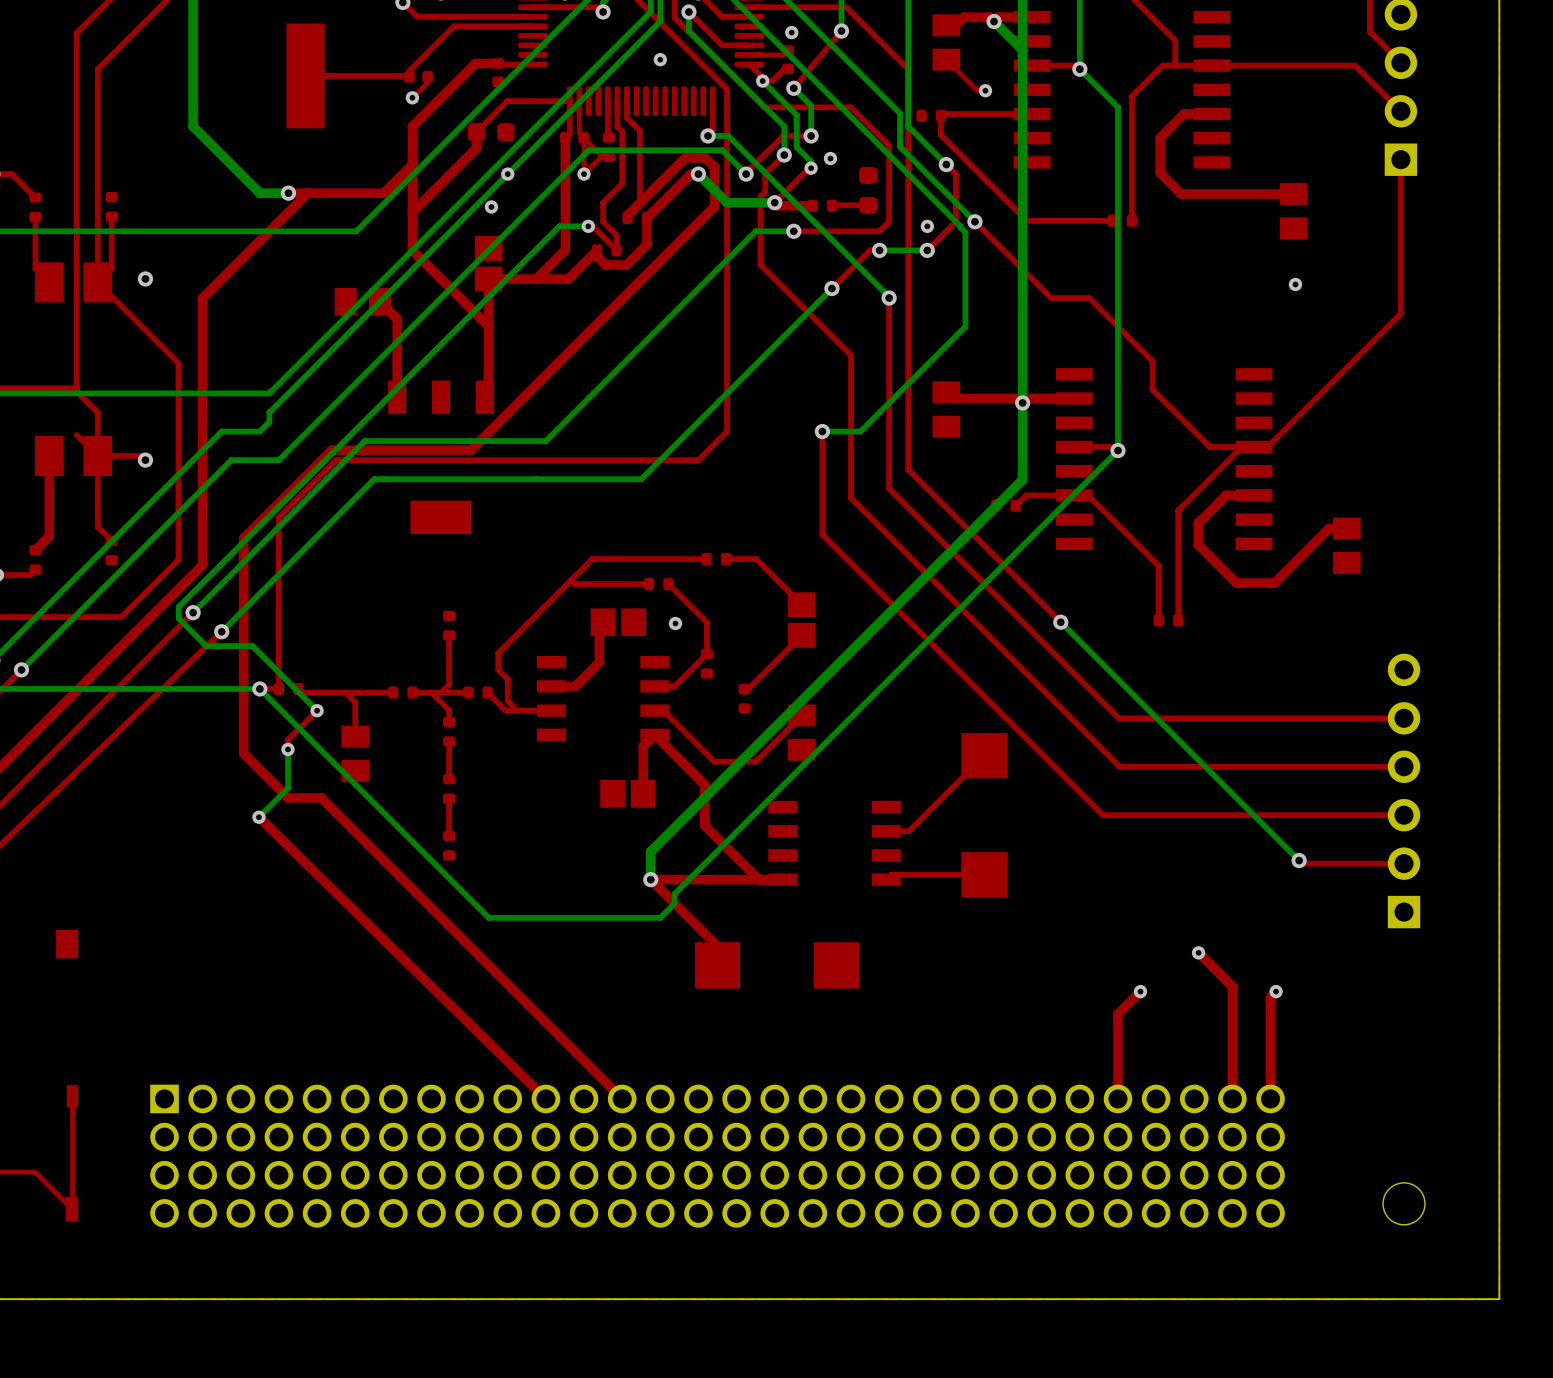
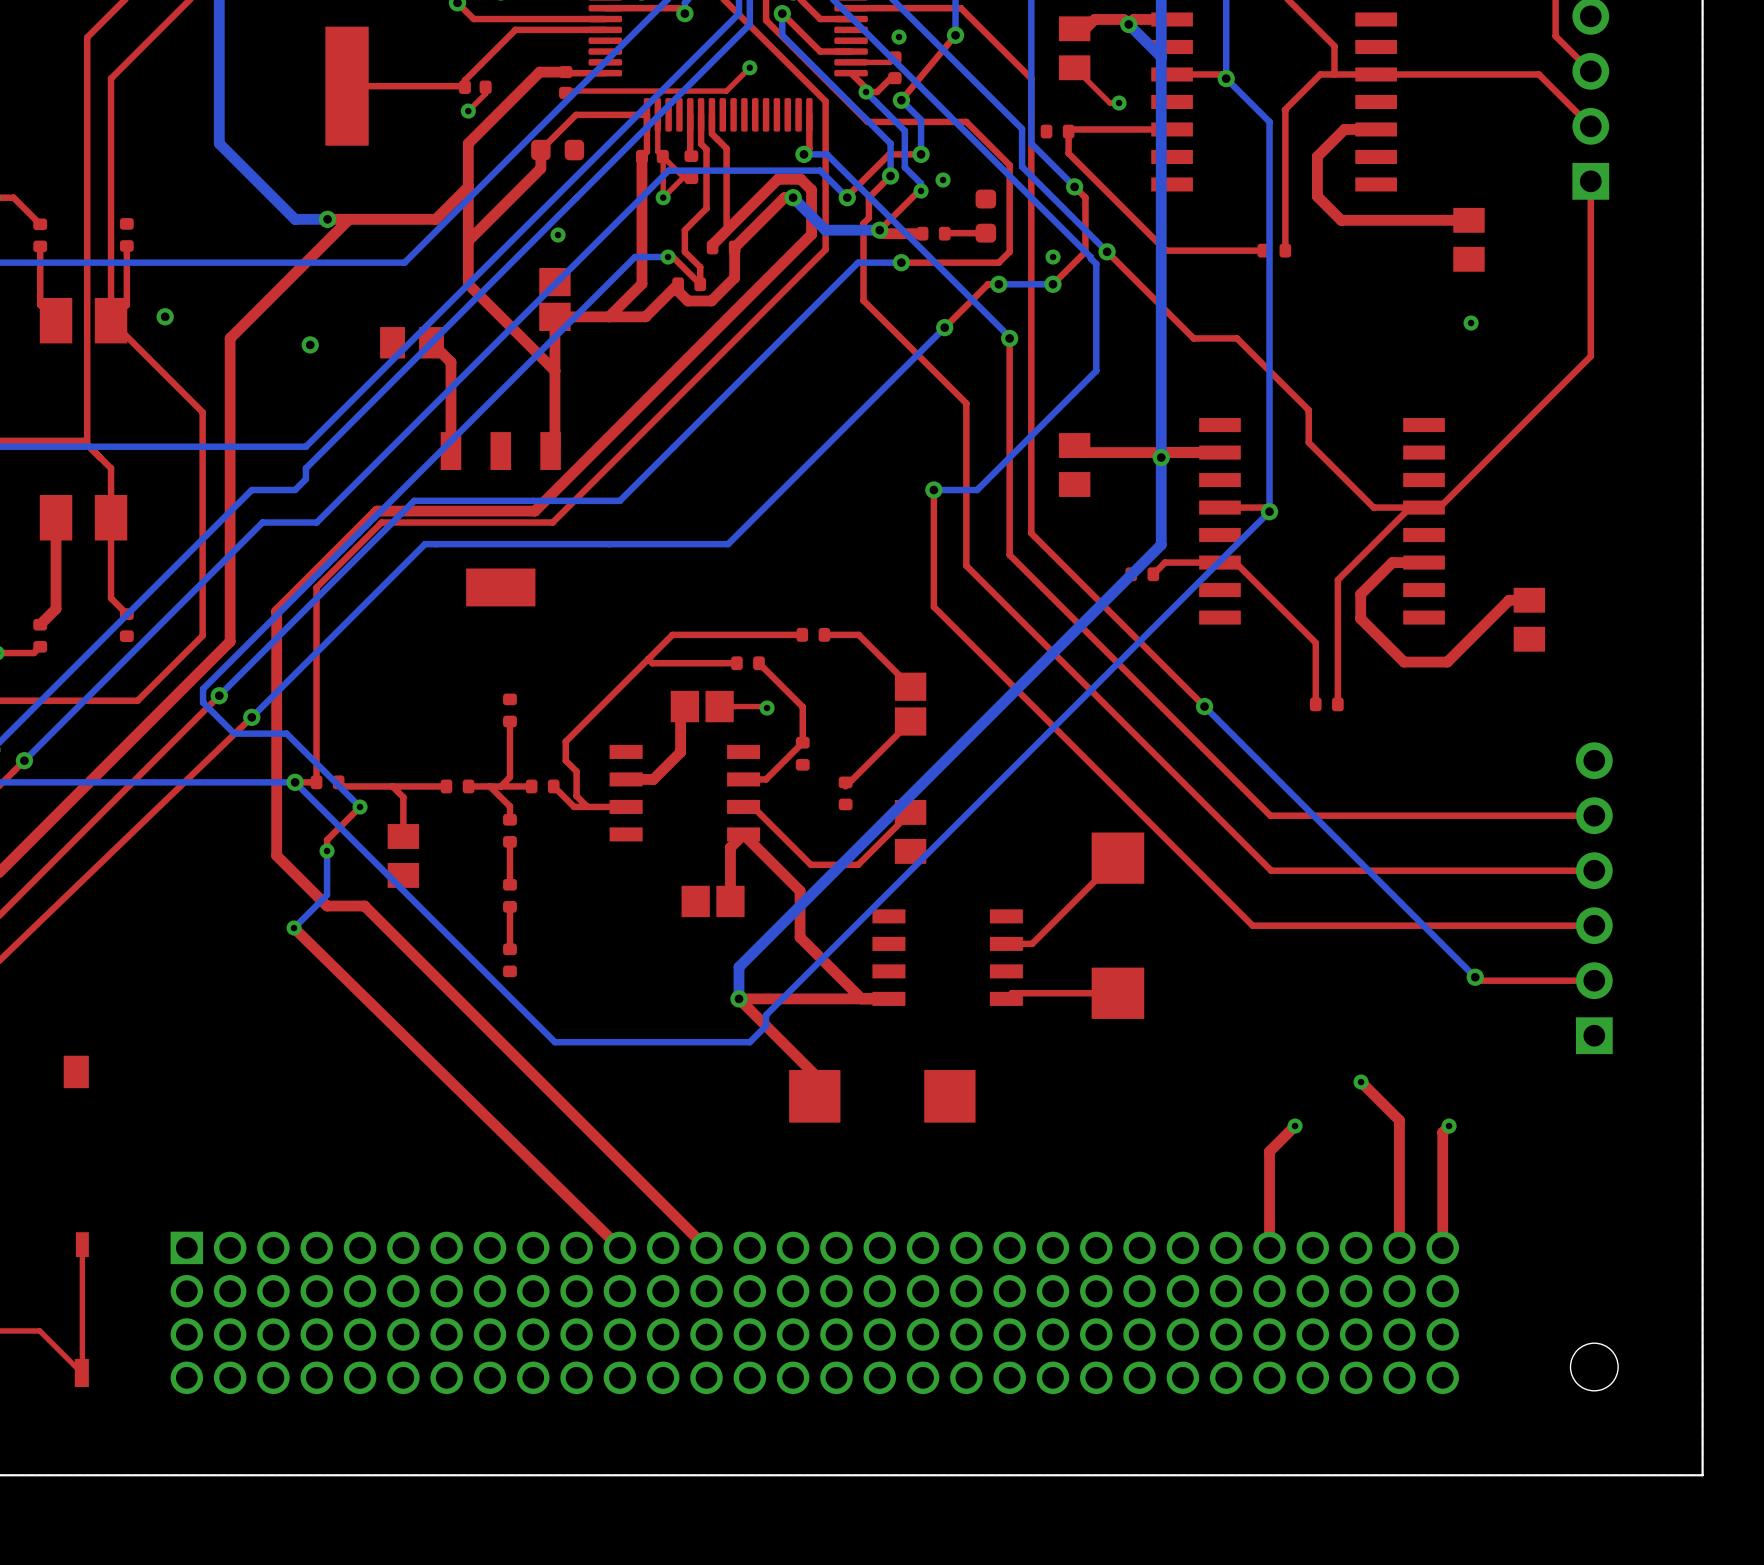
top track: none -> (749, 67) (726, 91) (567, 91) (565, 92)
via: (507, 174) -> none
top track: (727, 219) (727, 431) (698, 460) (486, 460) -> (825, 249) (552, 522)
via: none -> (310, 344)
top track: (76, 434) (97, 455) (141, 455) (145, 460) -> none
via: (145, 460) -> none
top track: none -> (719, 706) (767, 708)

